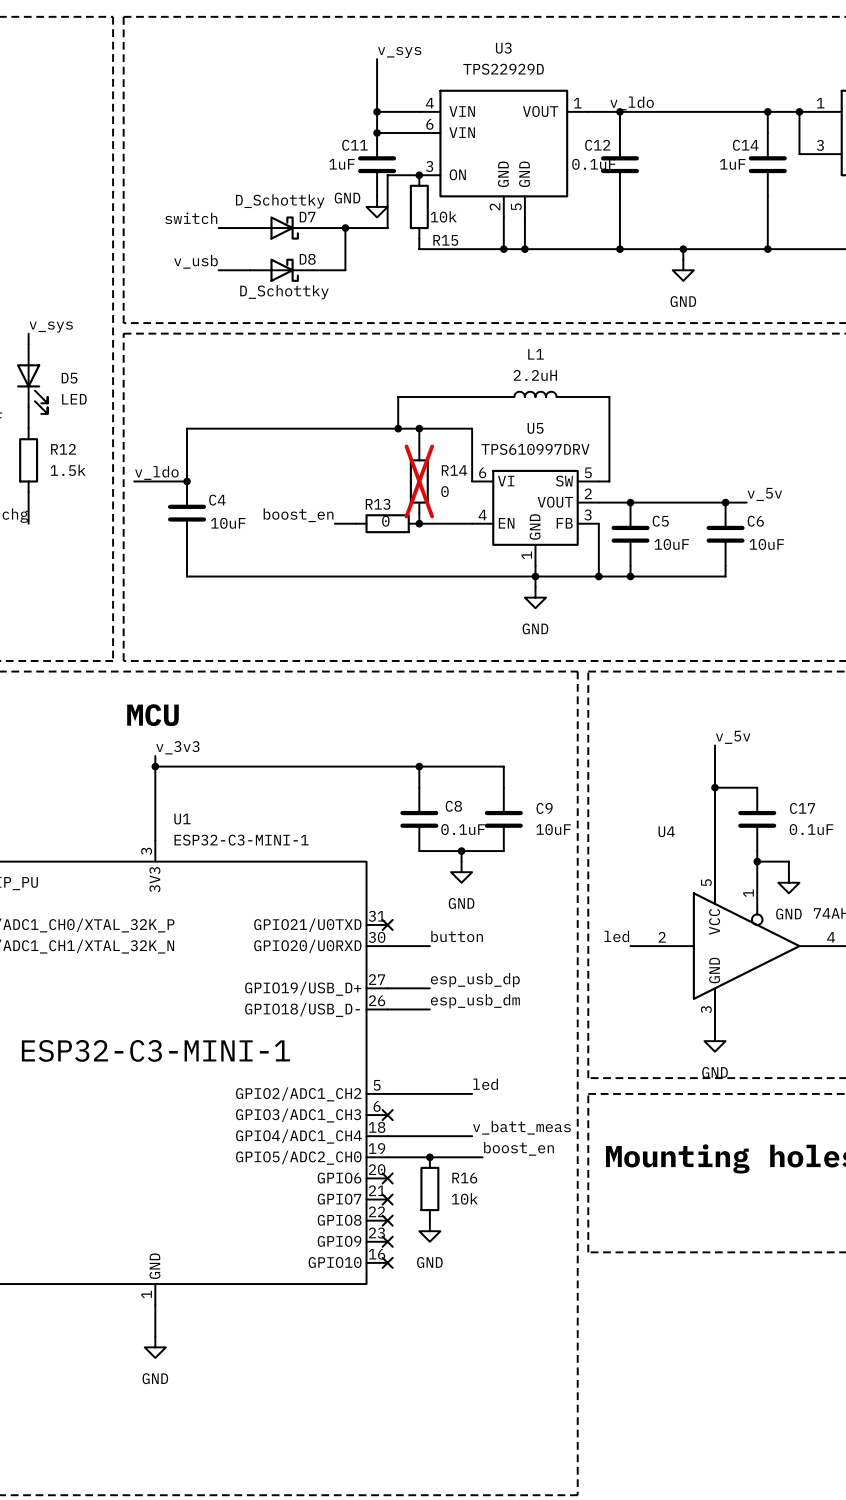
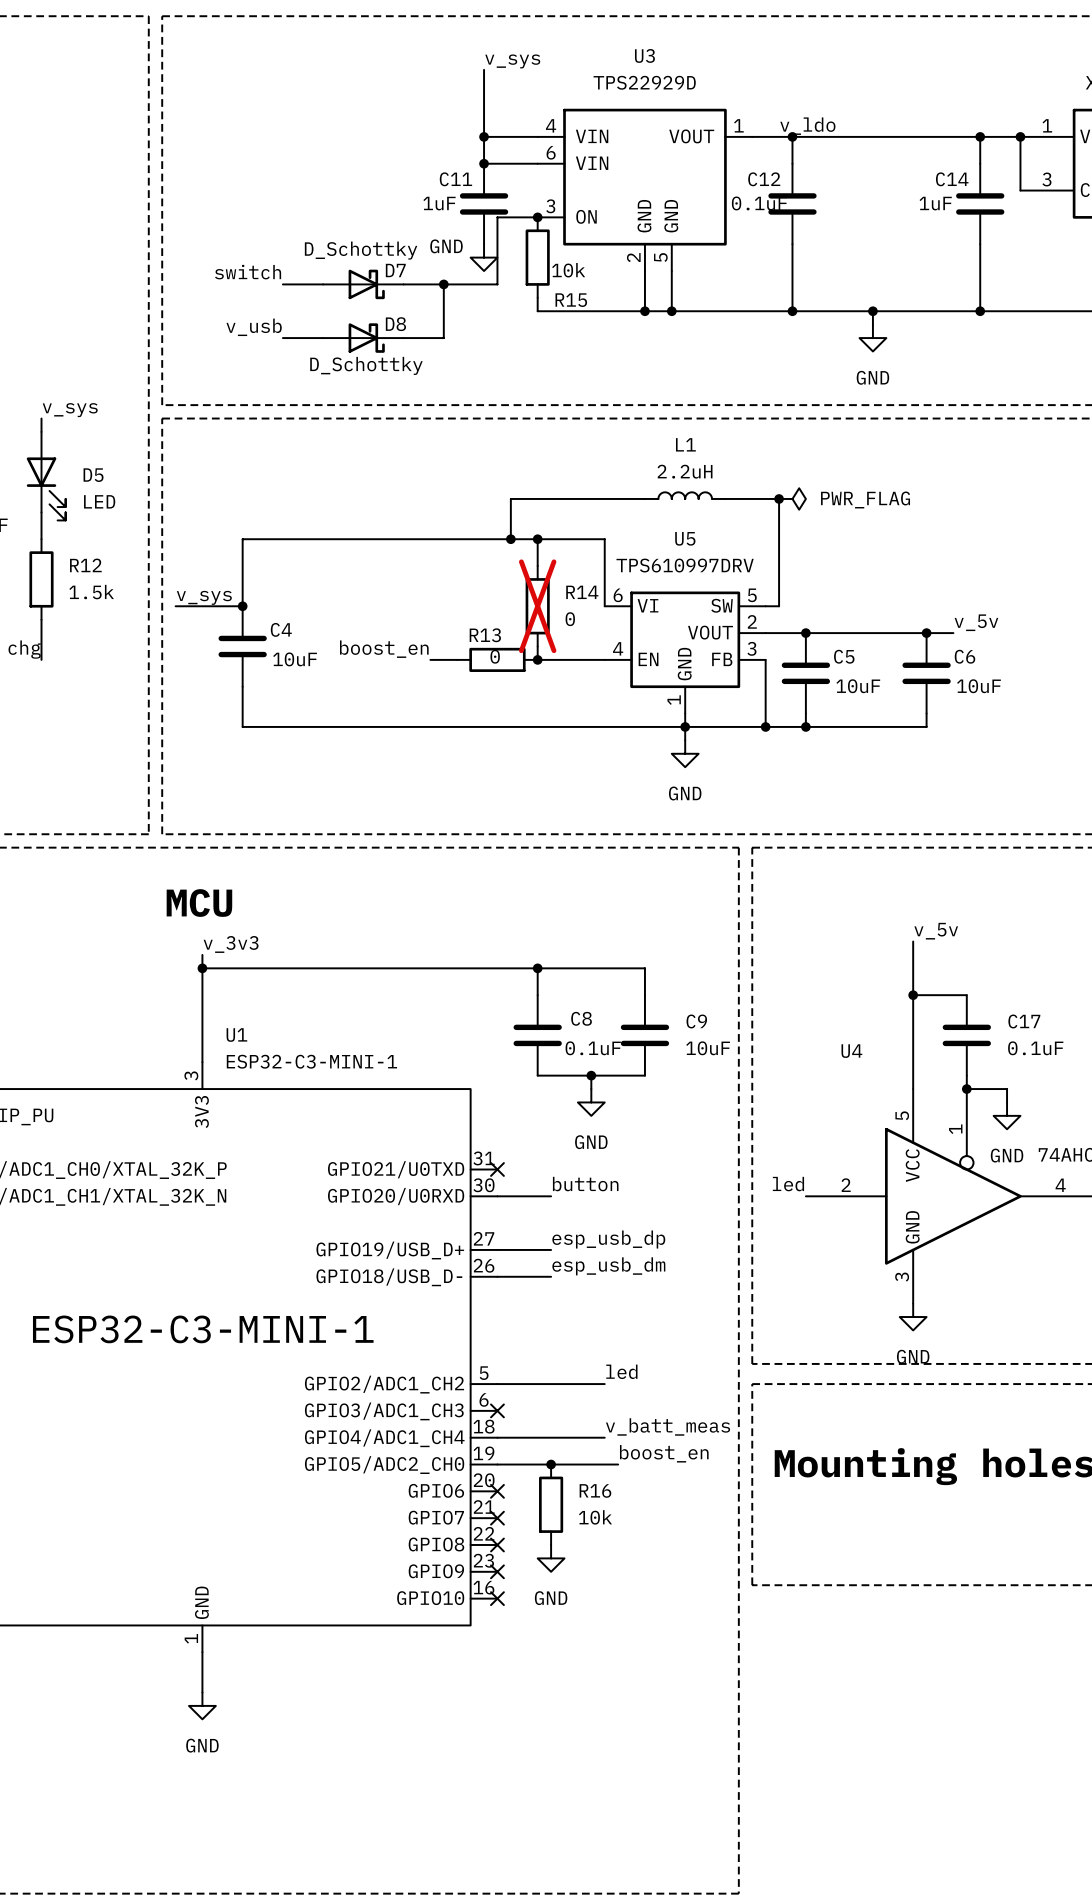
junction: none -> (779, 498)
power symbol: none -> PWR_FLAG (792, 498)
label: v_ldo (156, 473) -> v_sys (204, 597)

